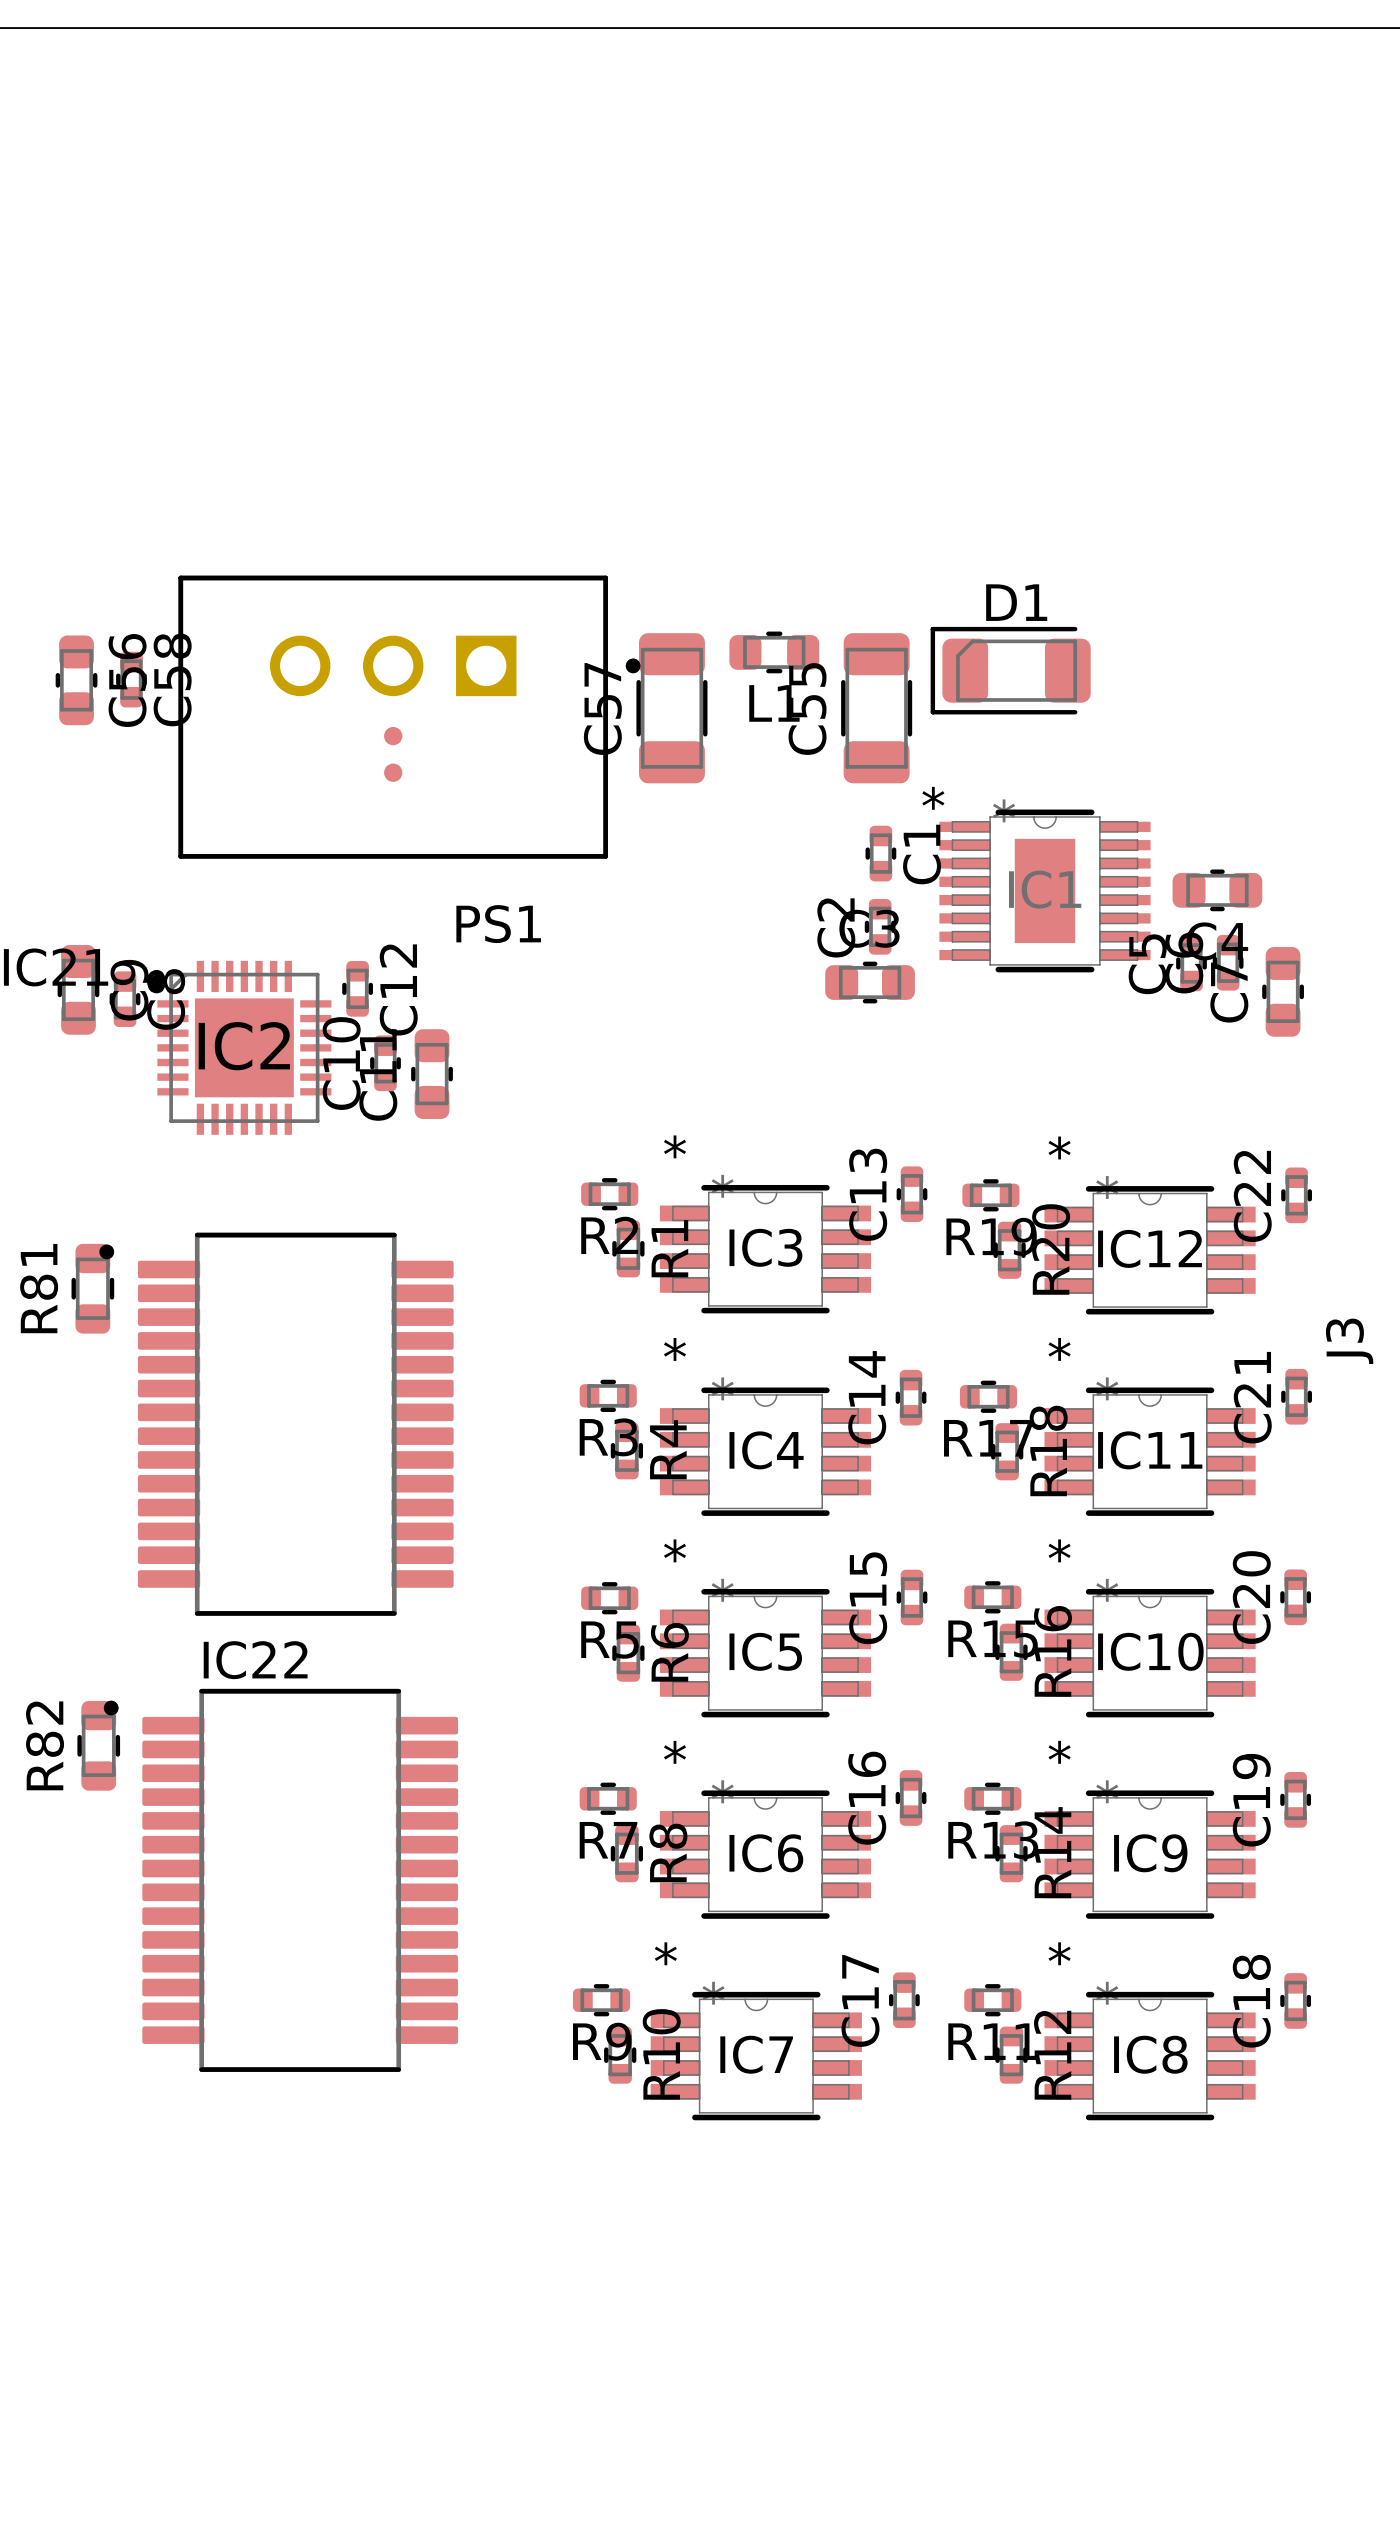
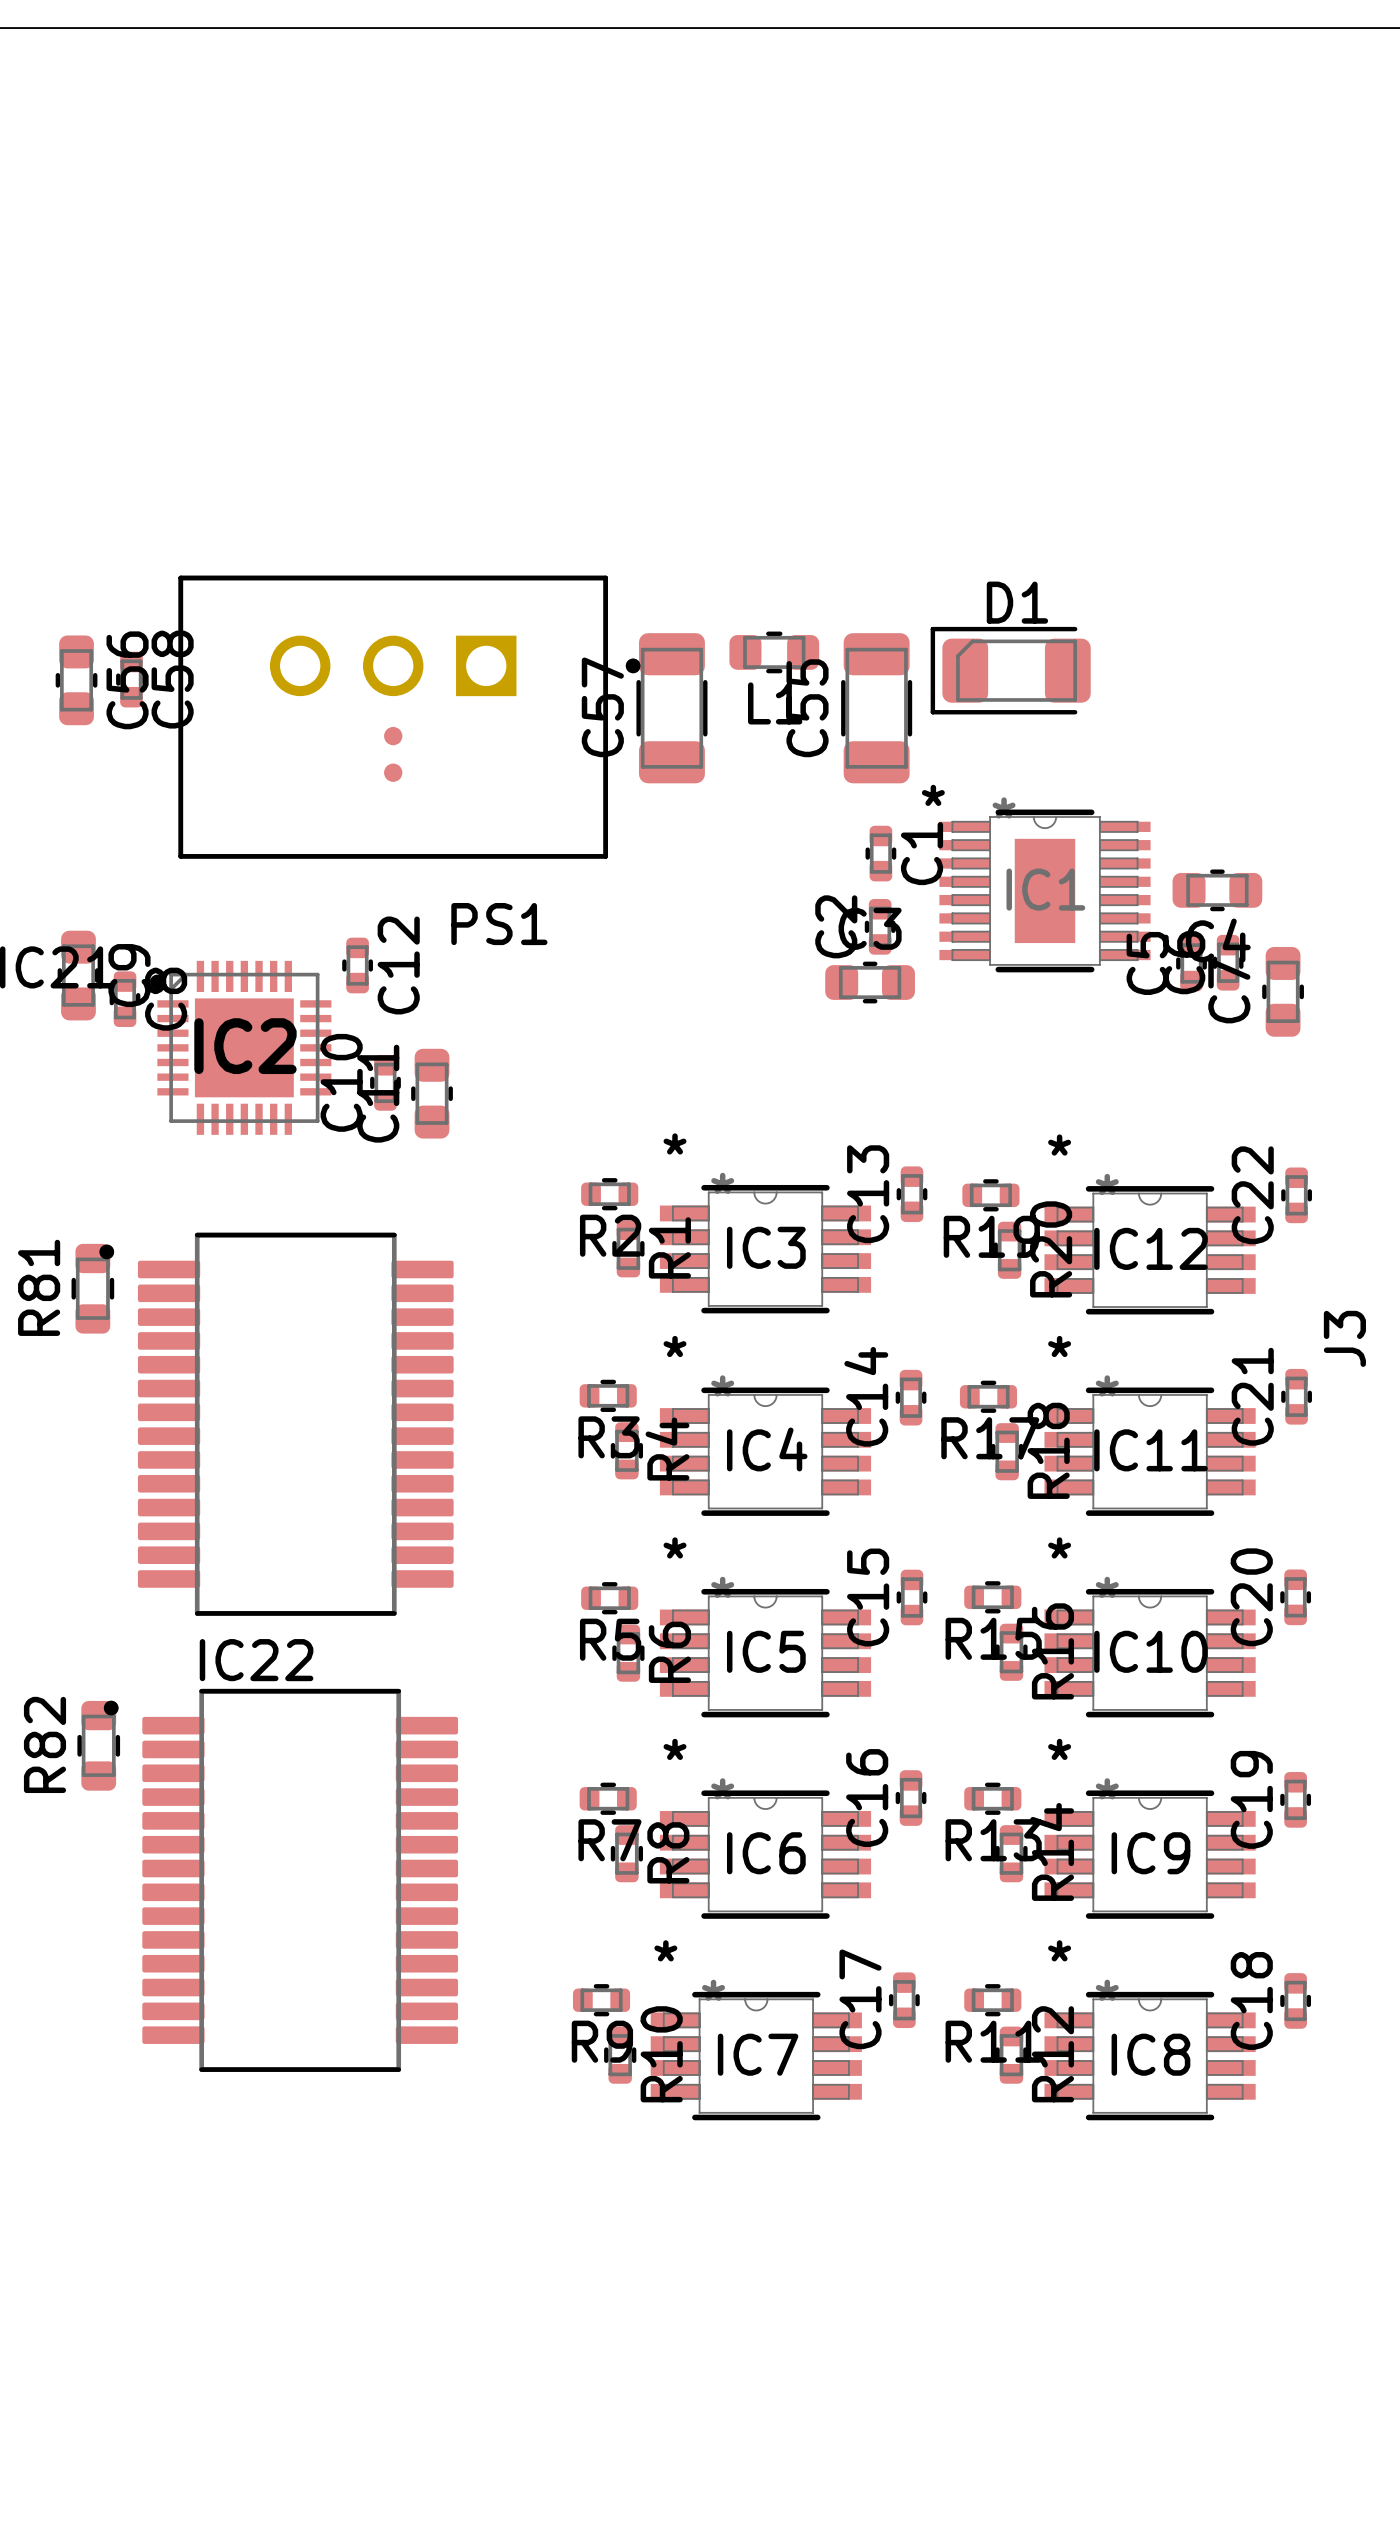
C12 position: (357, 988) -> (357, 965)
C9 position: (78, 989) -> (78, 975)
C10 position: (385, 1063) -> (385, 1082)
C11 position: (432, 1074) -> (432, 1093)

